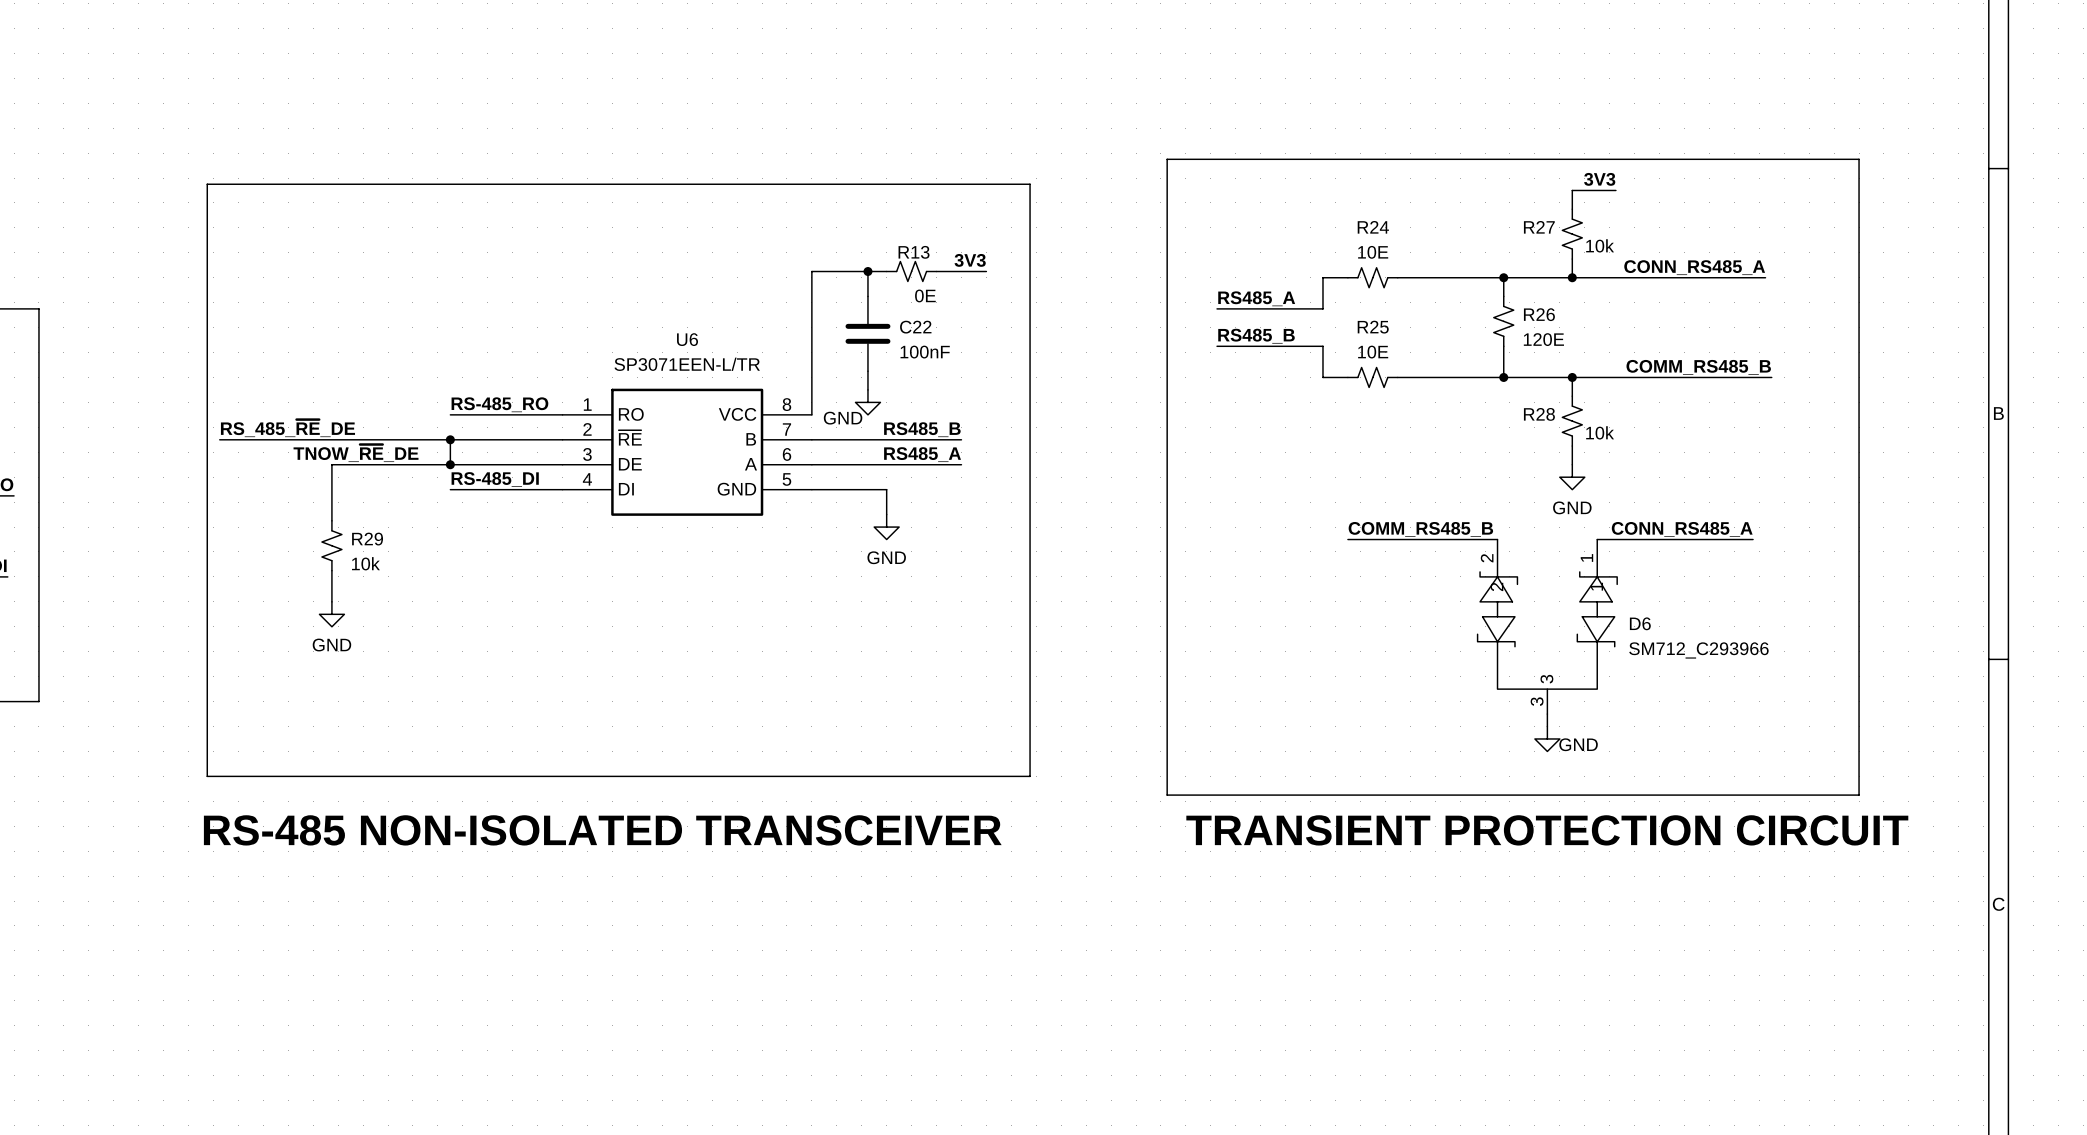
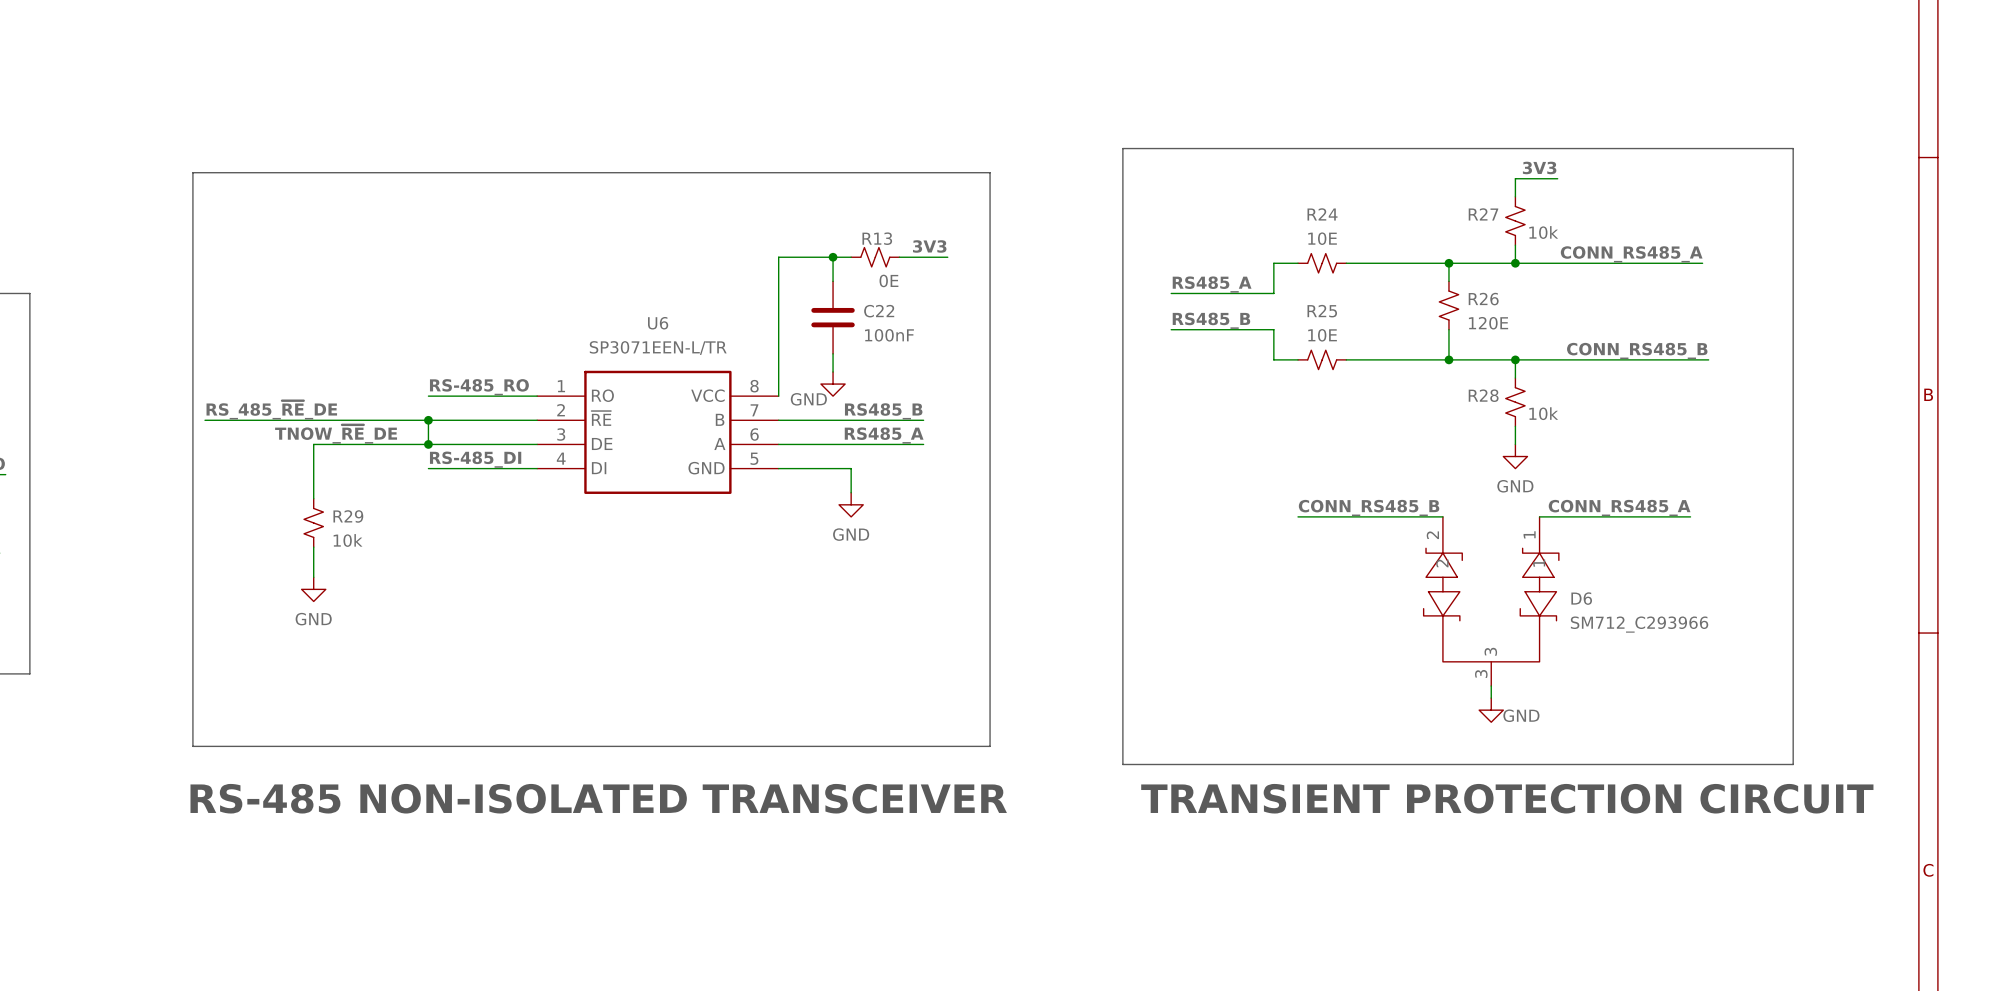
label: COMM_RS485_B (1698, 367) -> CONN_RS485_B (1637, 350)
label: COMM_RS485_B (1420, 529) -> CONN_RS485_B (1369, 507)

